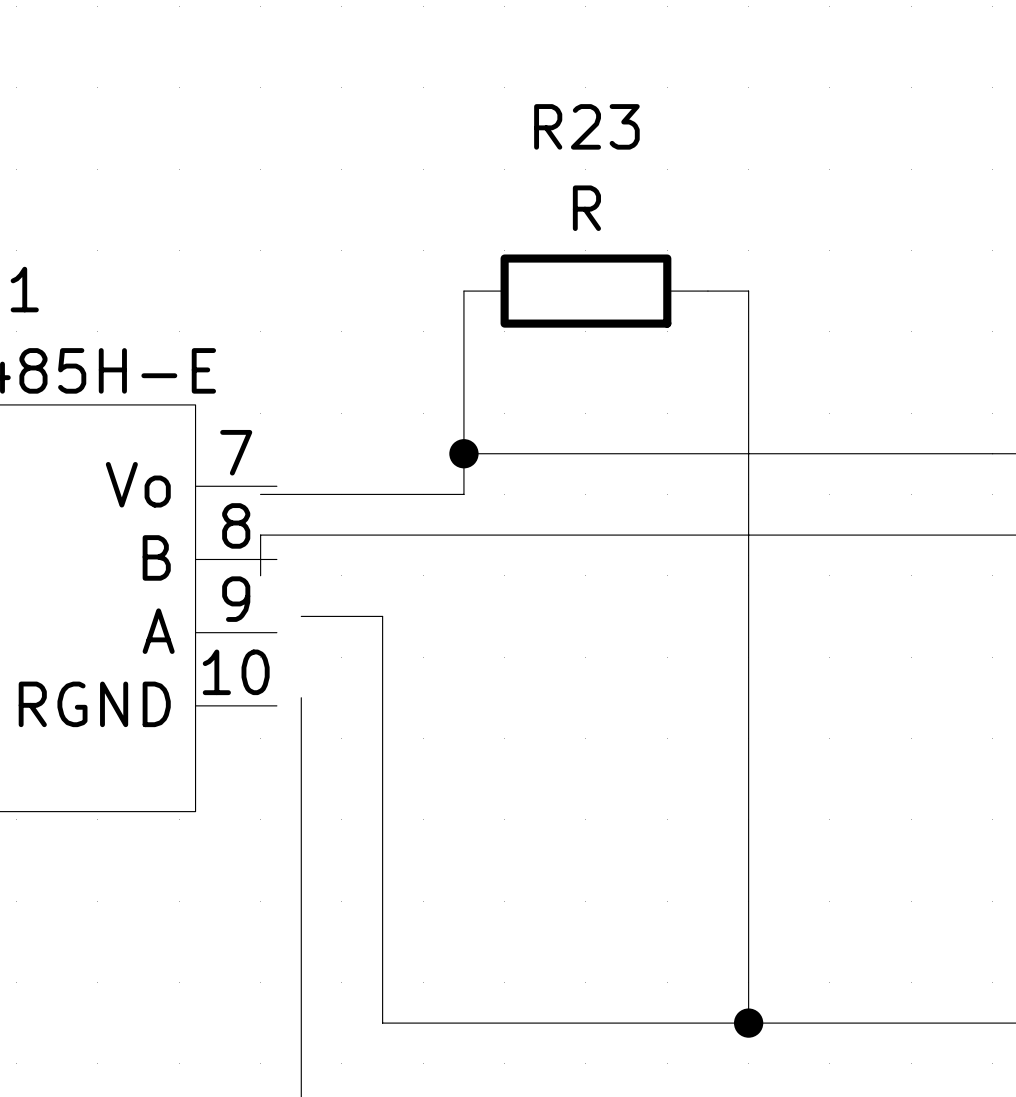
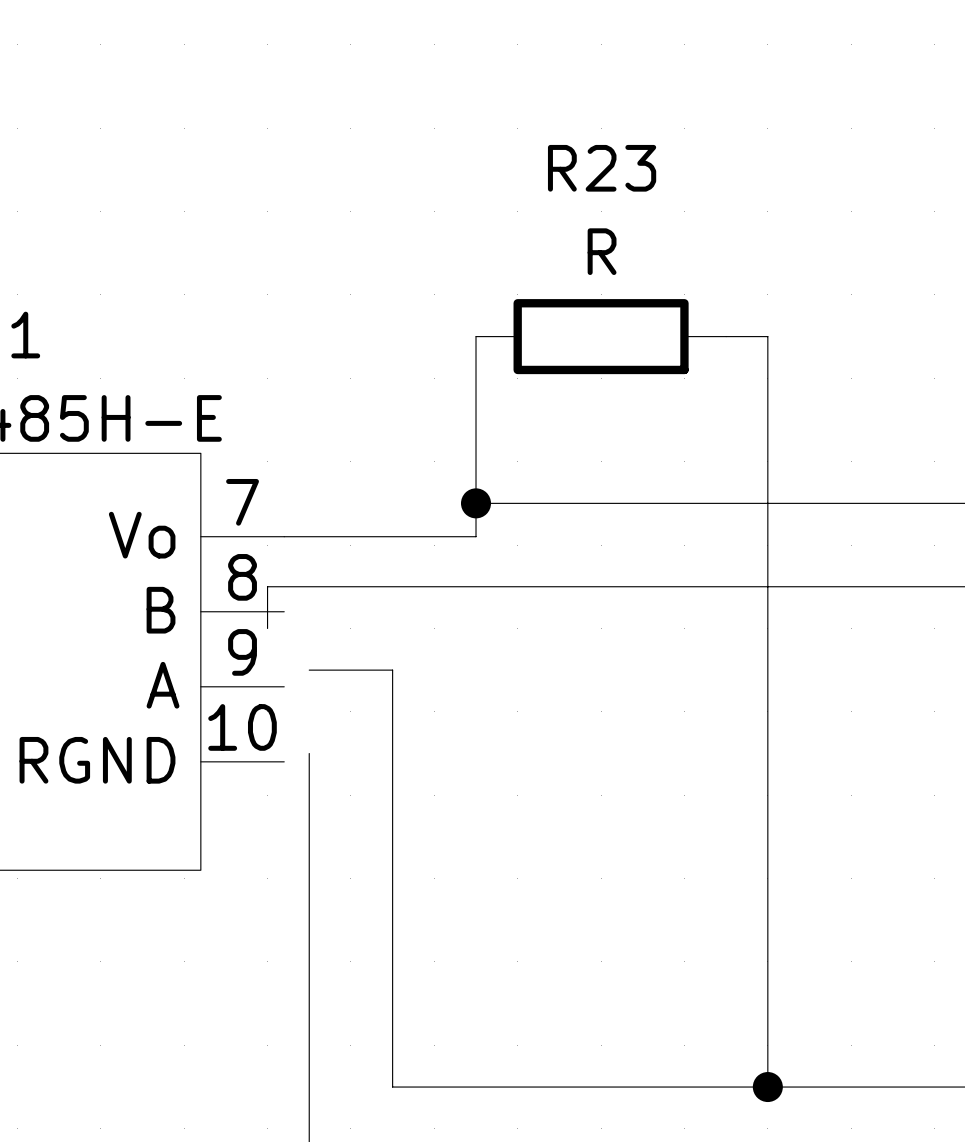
wire: (463, 486) (463, 494) (260, 494) -> (476, 536) (284, 536)

